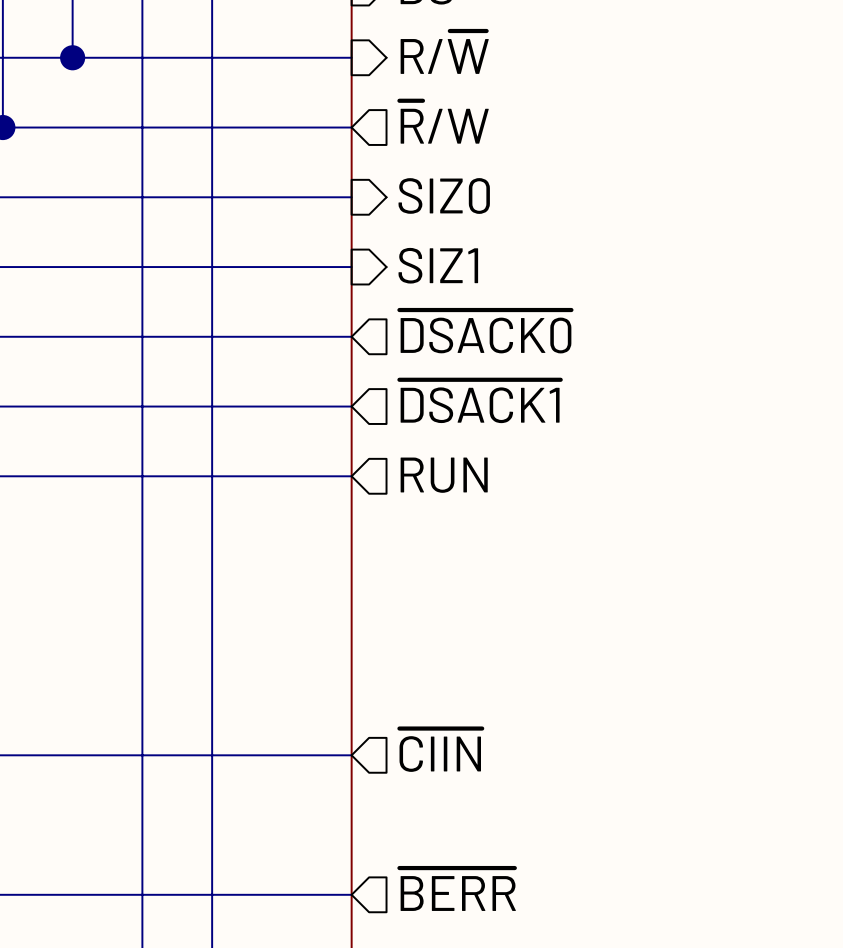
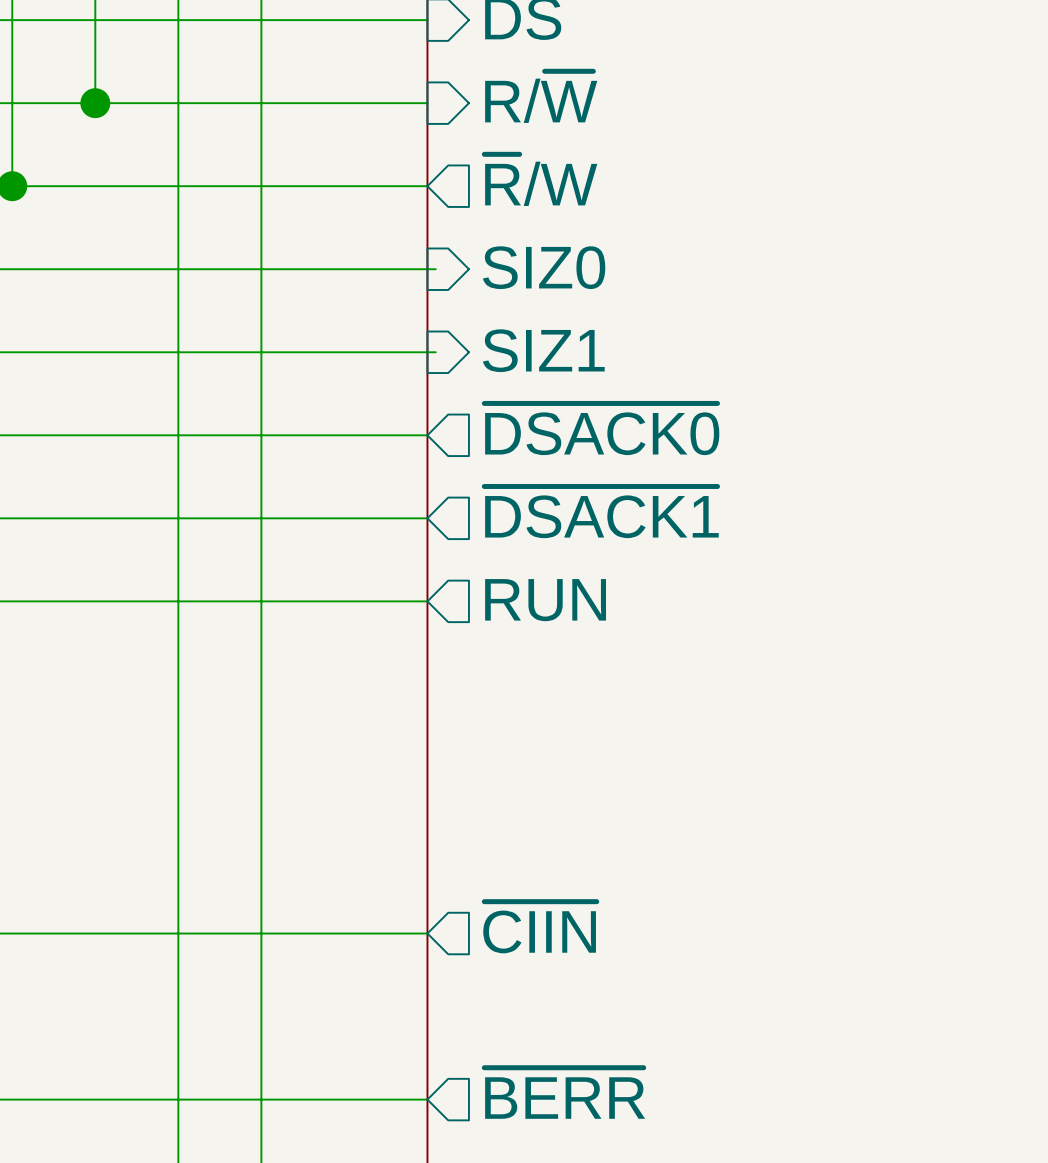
wire: none -> (427, 269) (435, 269)
wire: none -> (427, 352) (435, 352)

